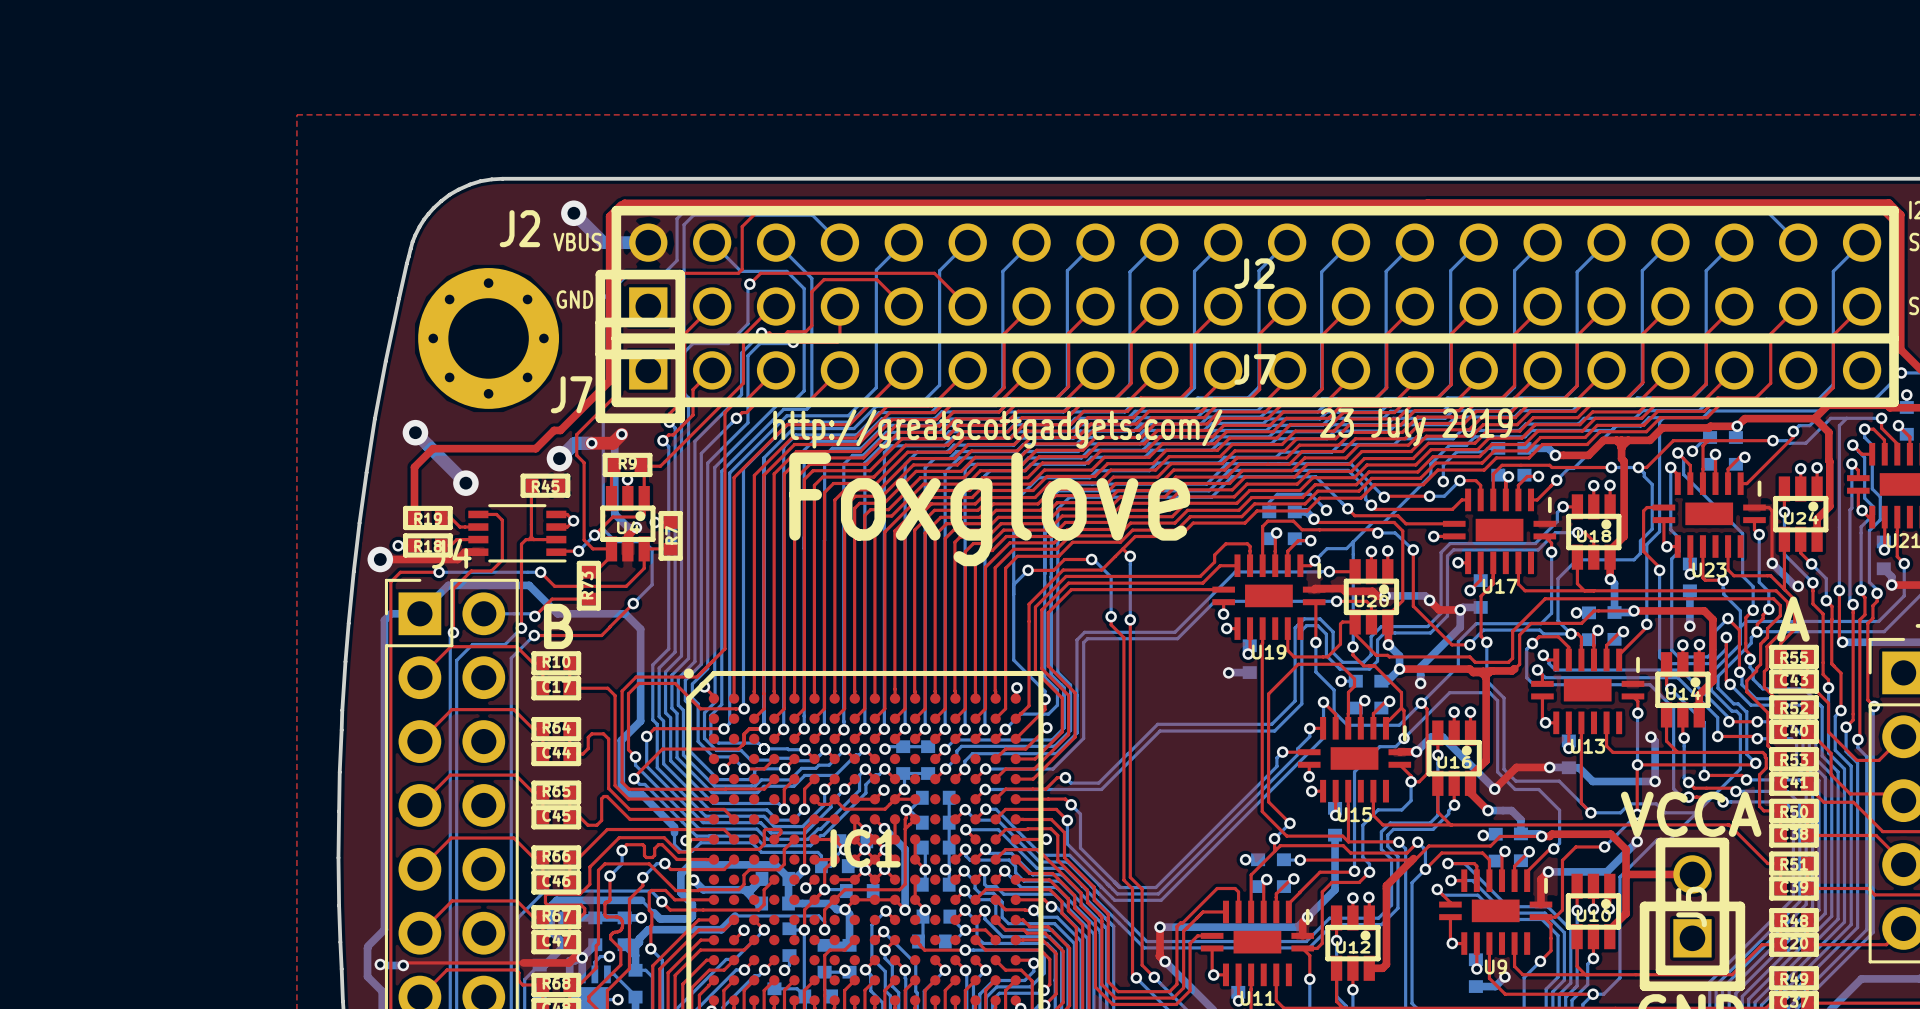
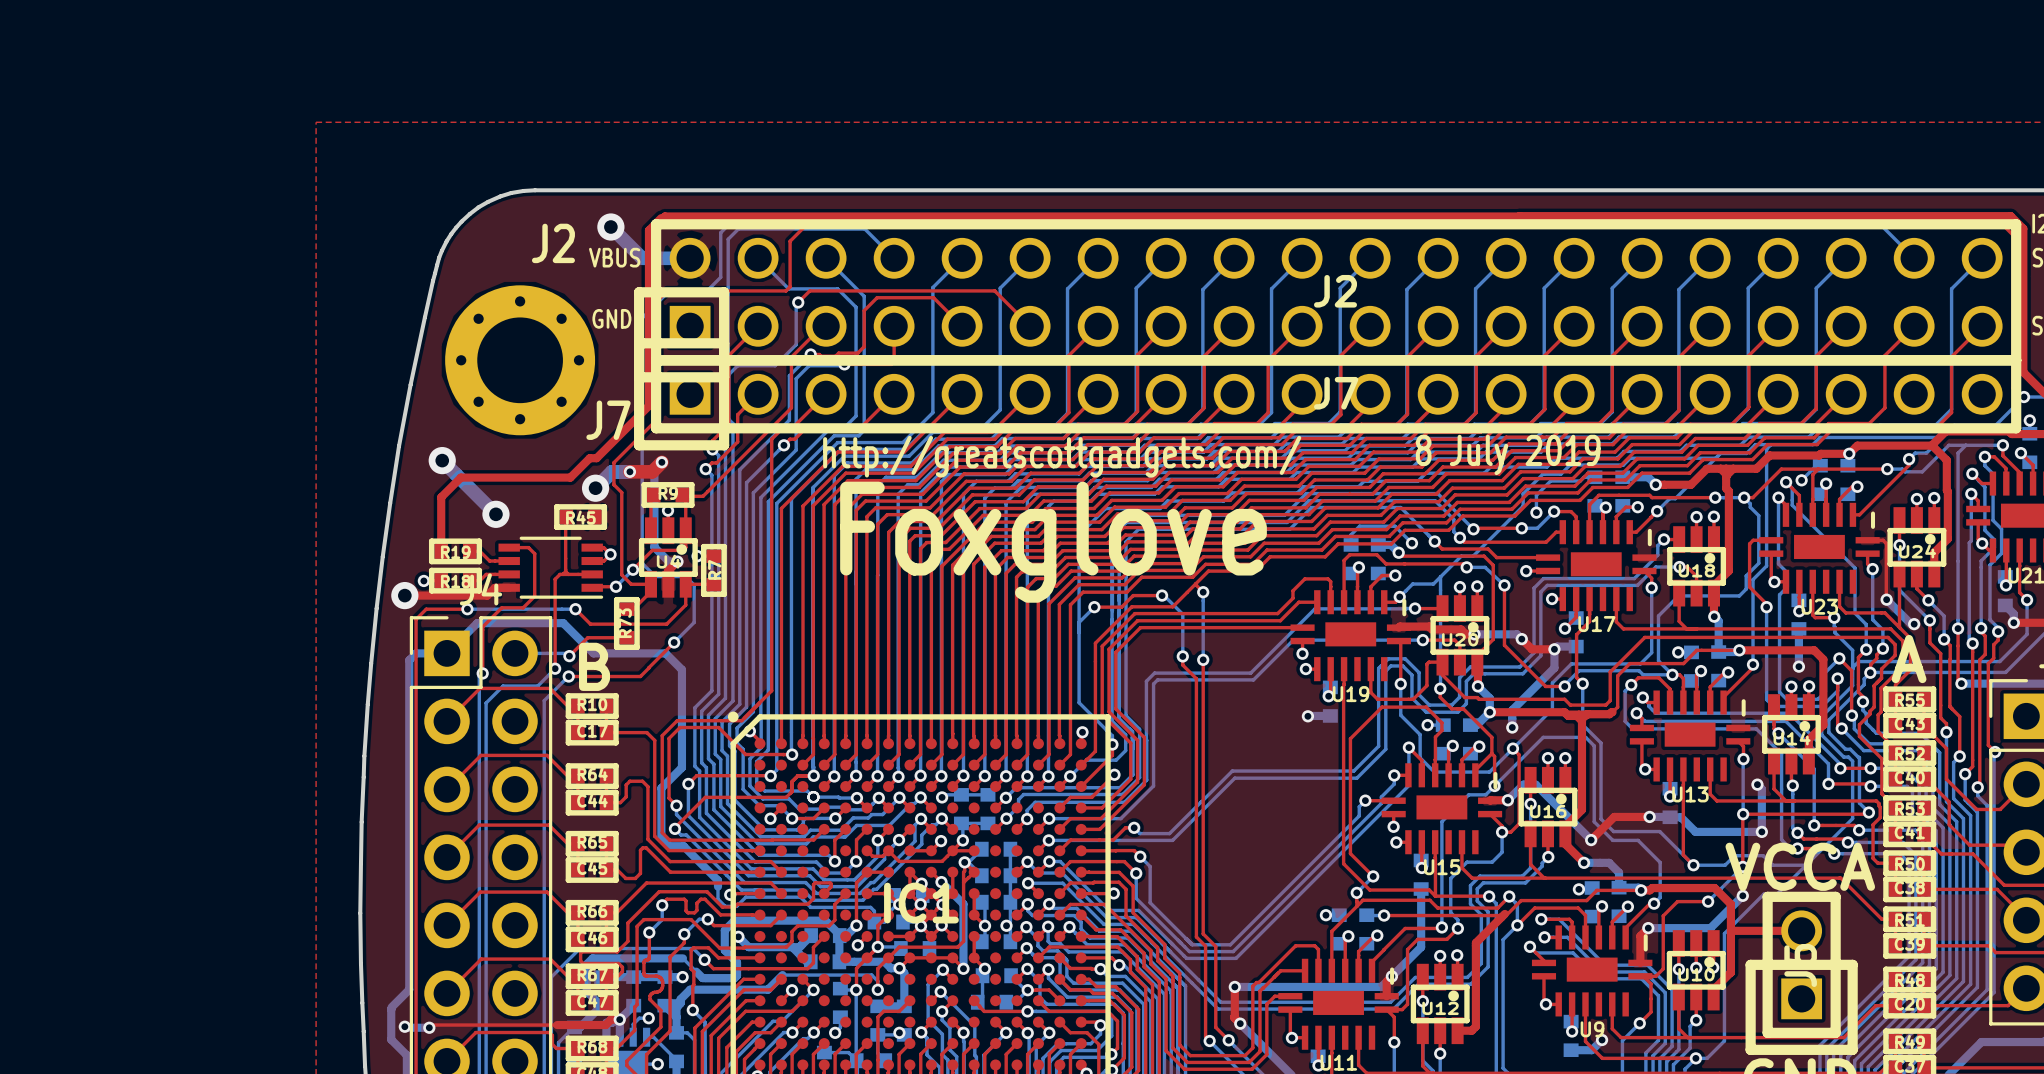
text: 23 July 2019 (1416, 427) -> 8 July 2019 (1508, 454)

